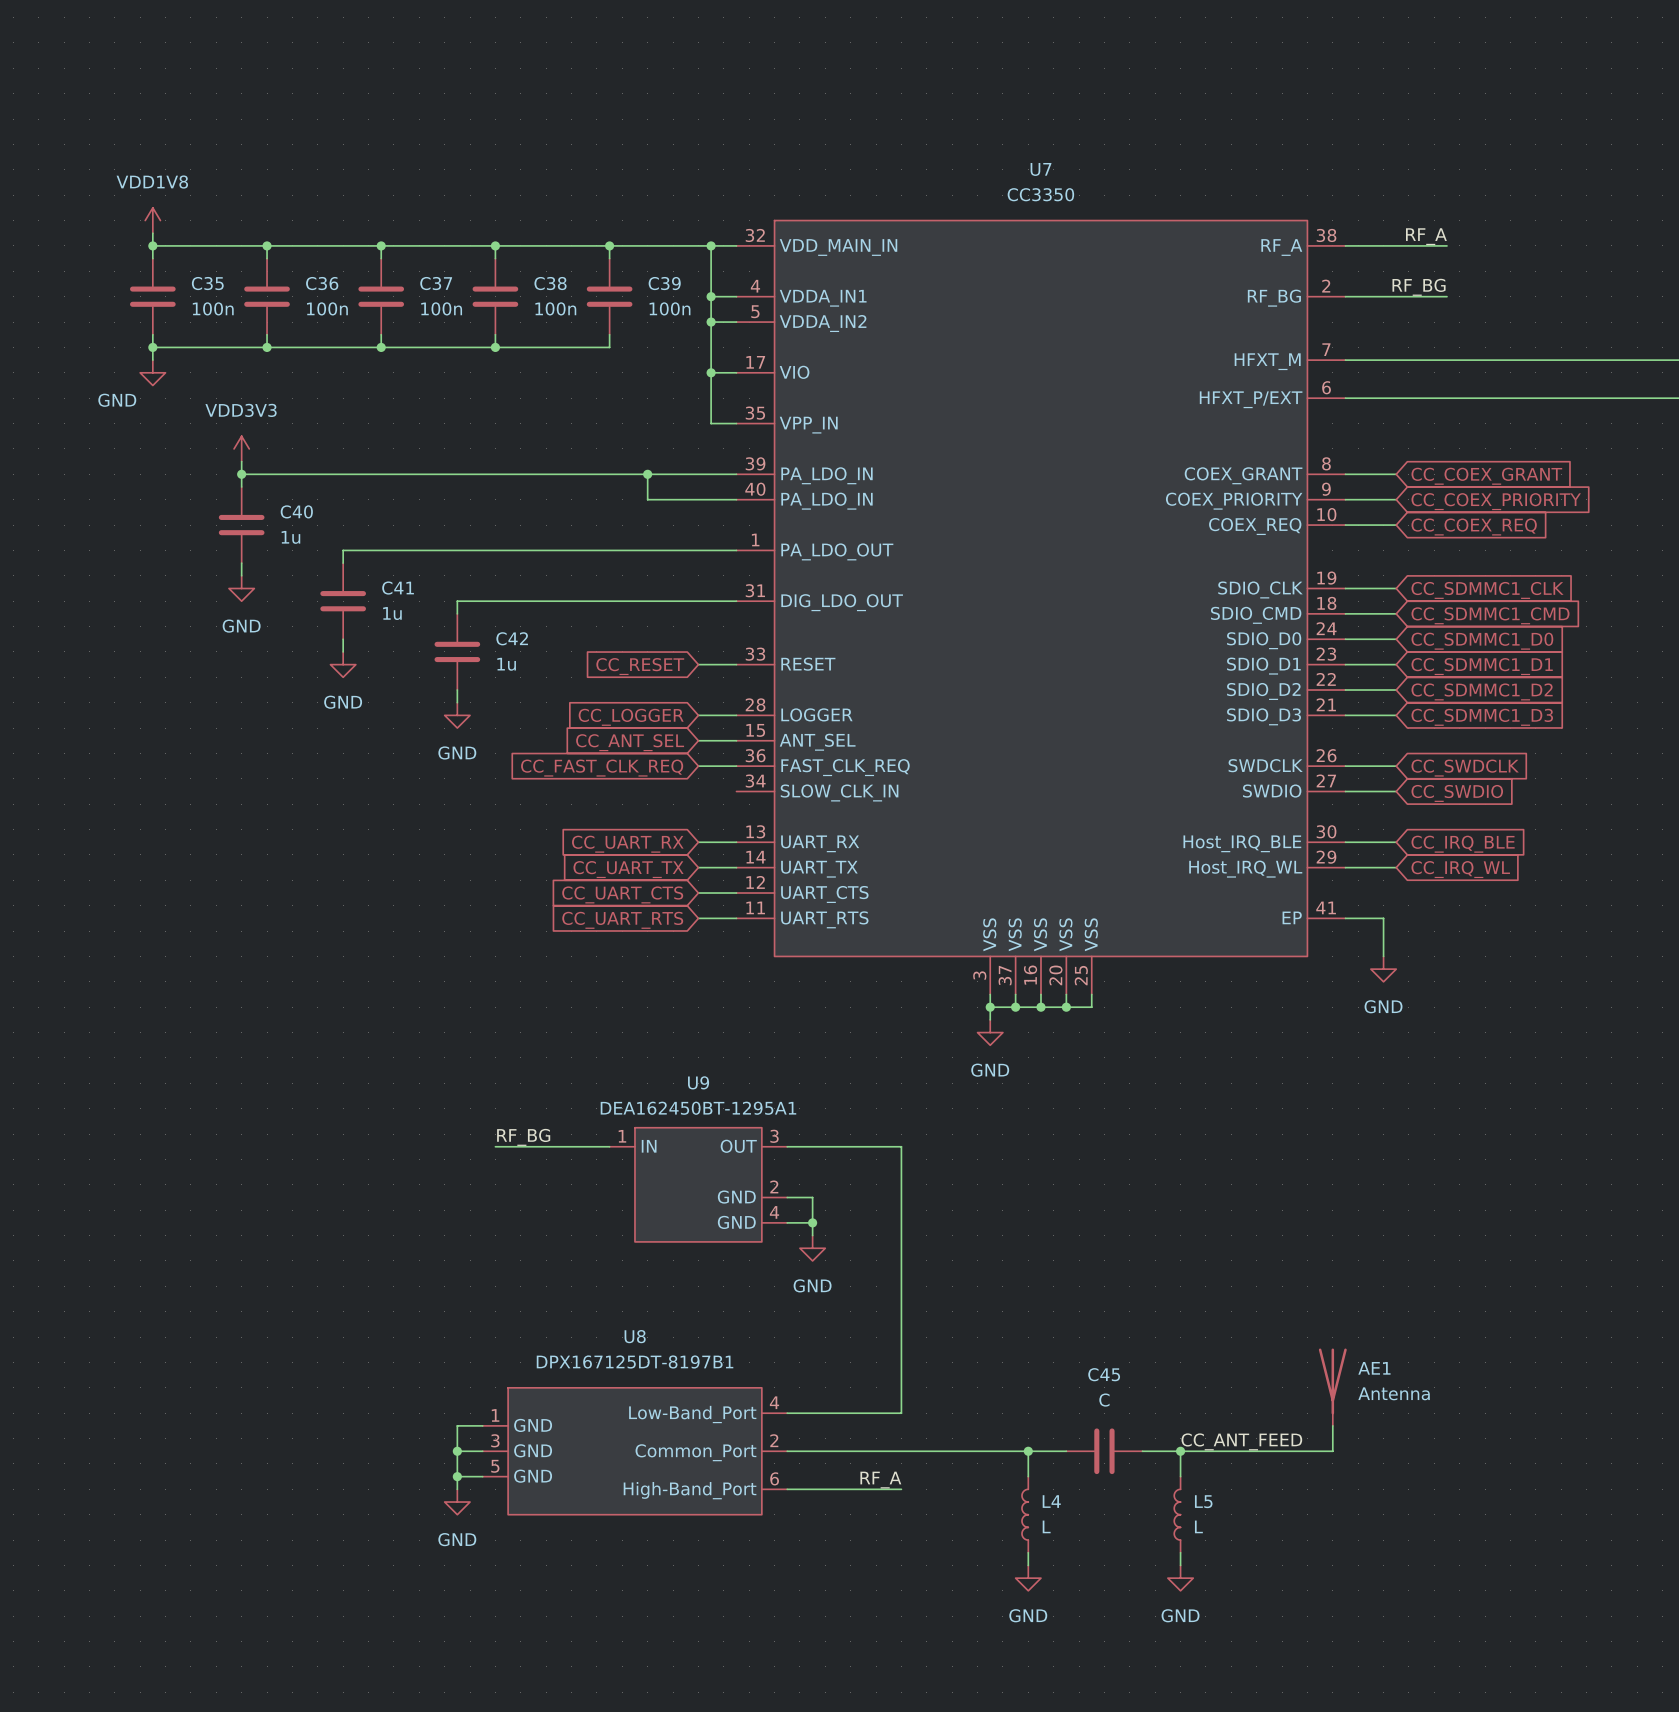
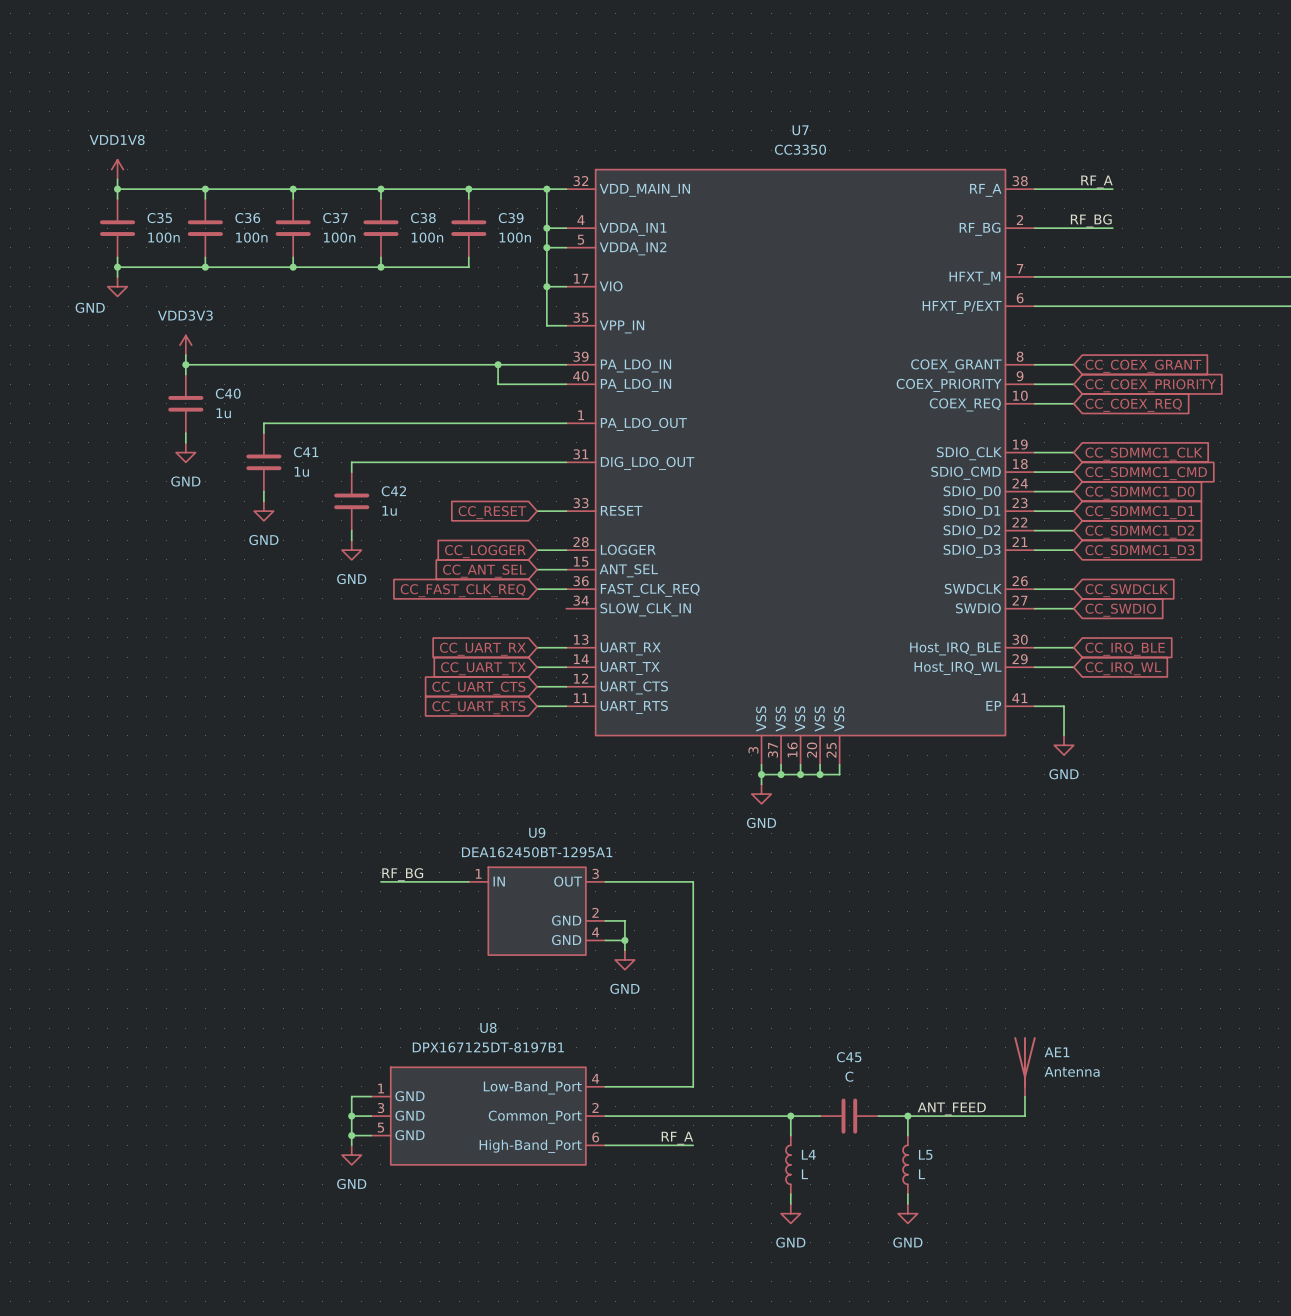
label: CC_ANT_FEED (1241, 1441) -> ANT_FEED (951, 1108)

